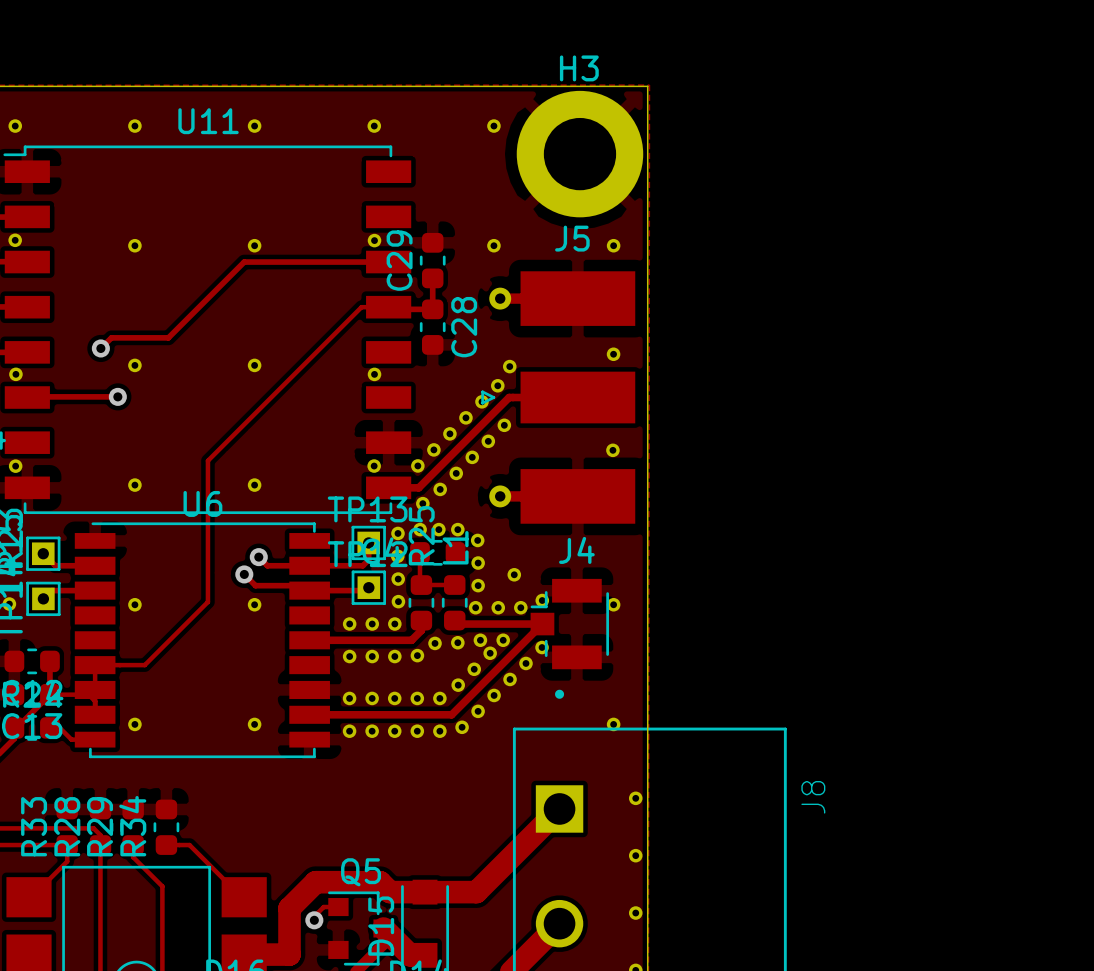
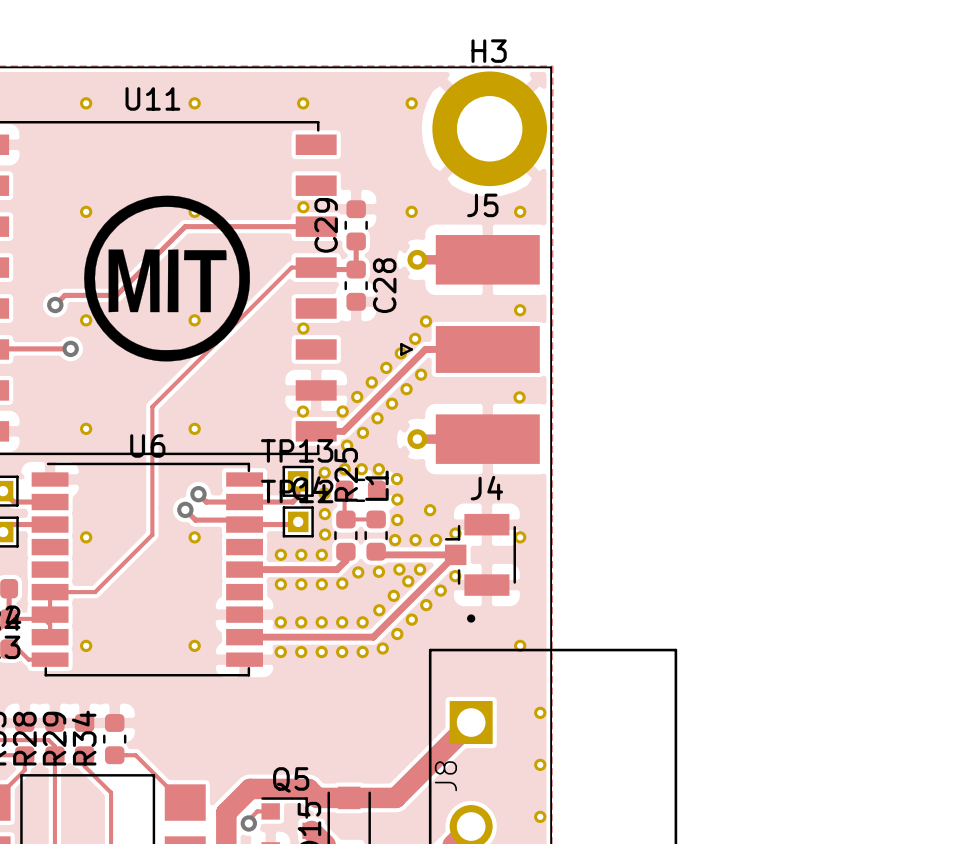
drawing: none -> [84, 195, 250, 362]
J8 name position: J8 (813, 797) -> J8 (445, 776)

